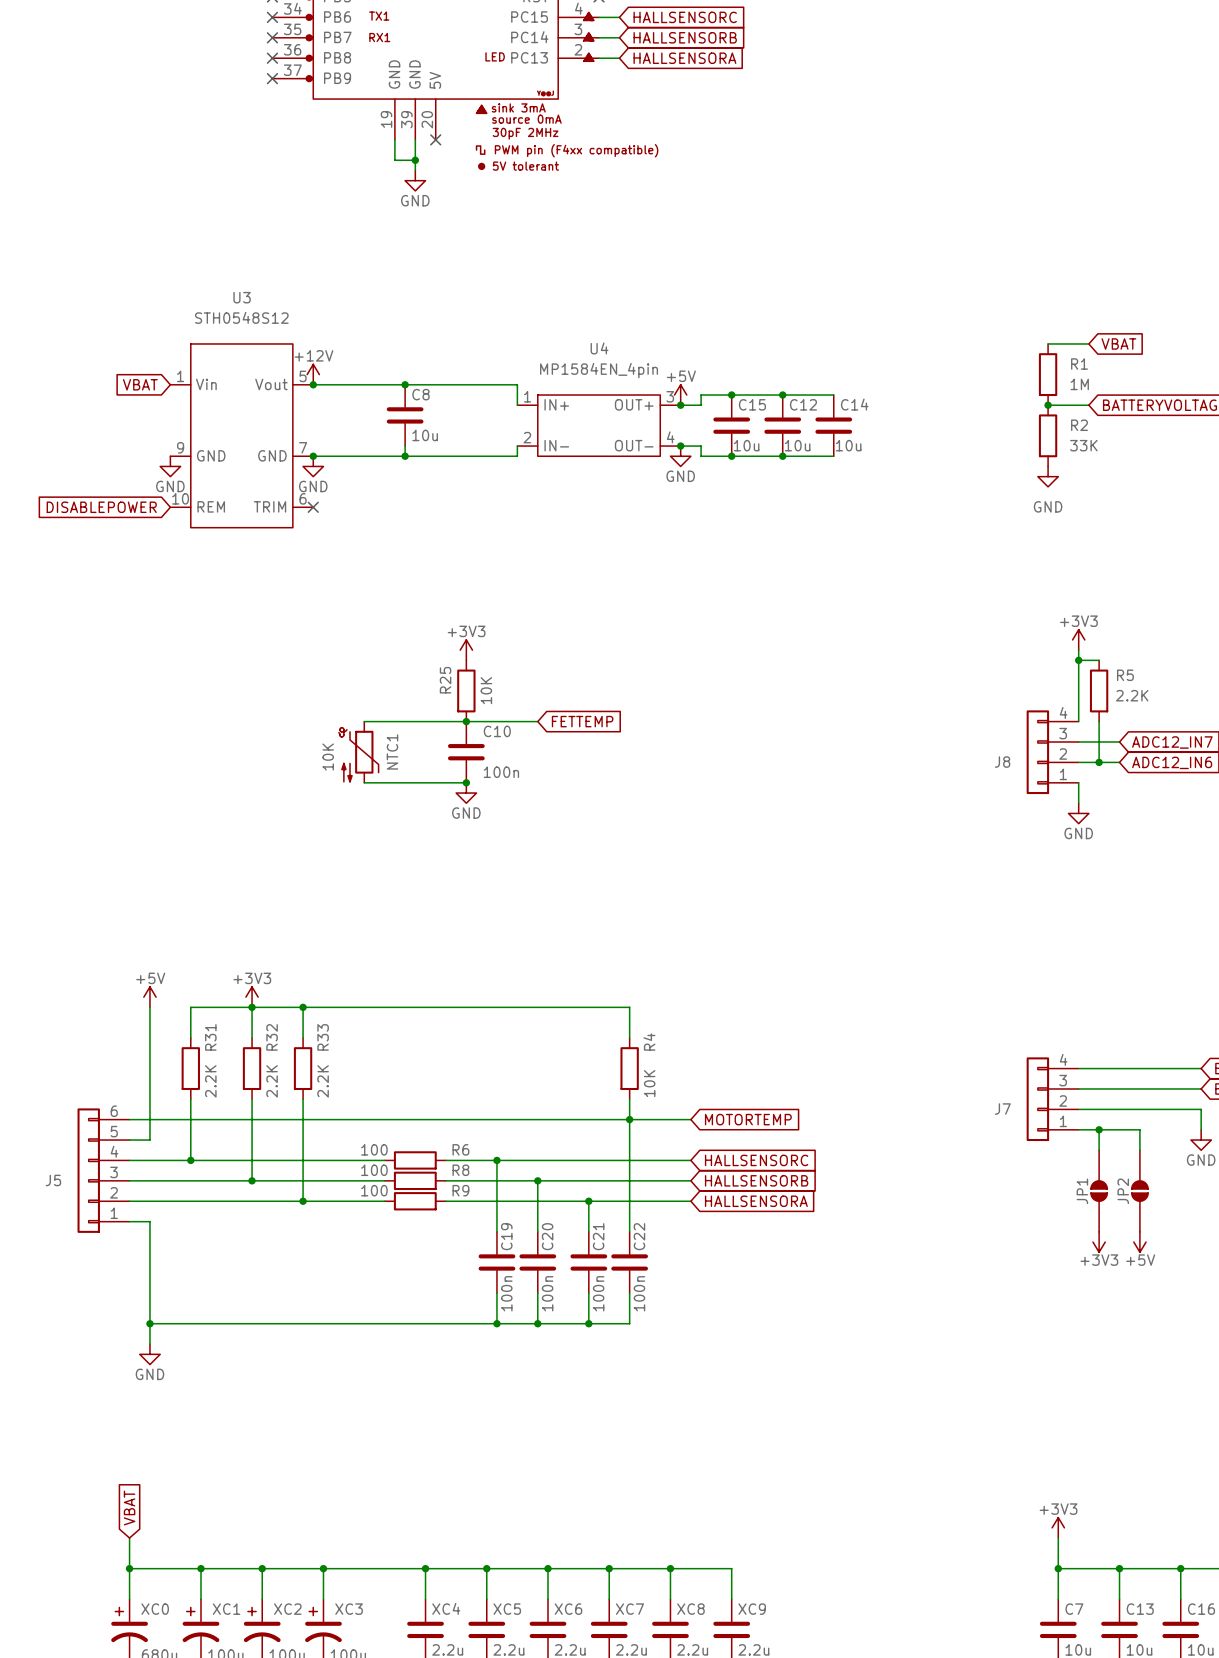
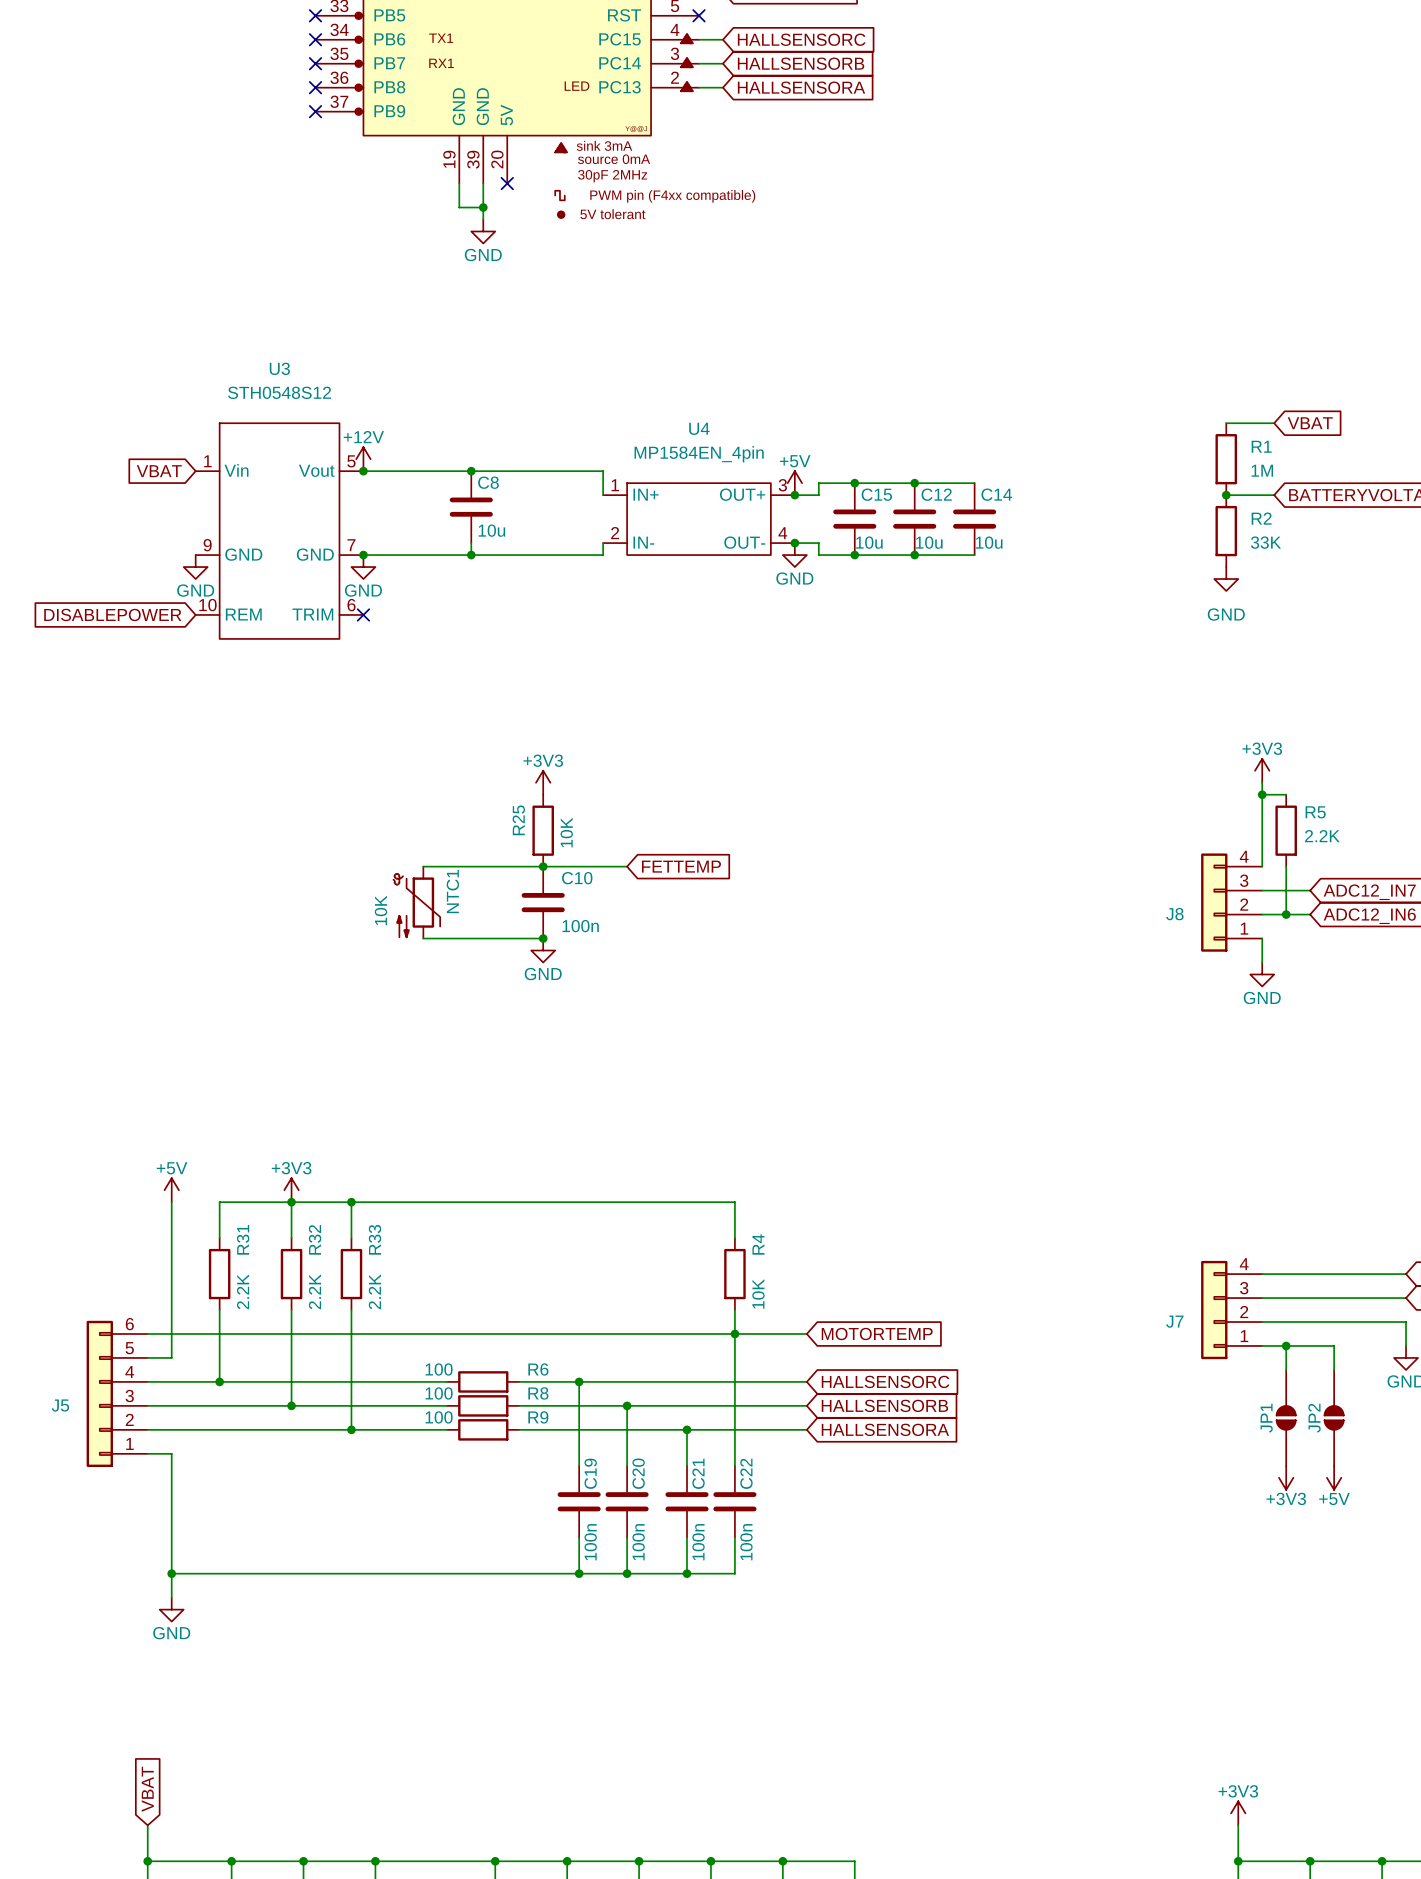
NTC1 name position: NTC1 (392, 751) -> NTC1 (452, 891)

